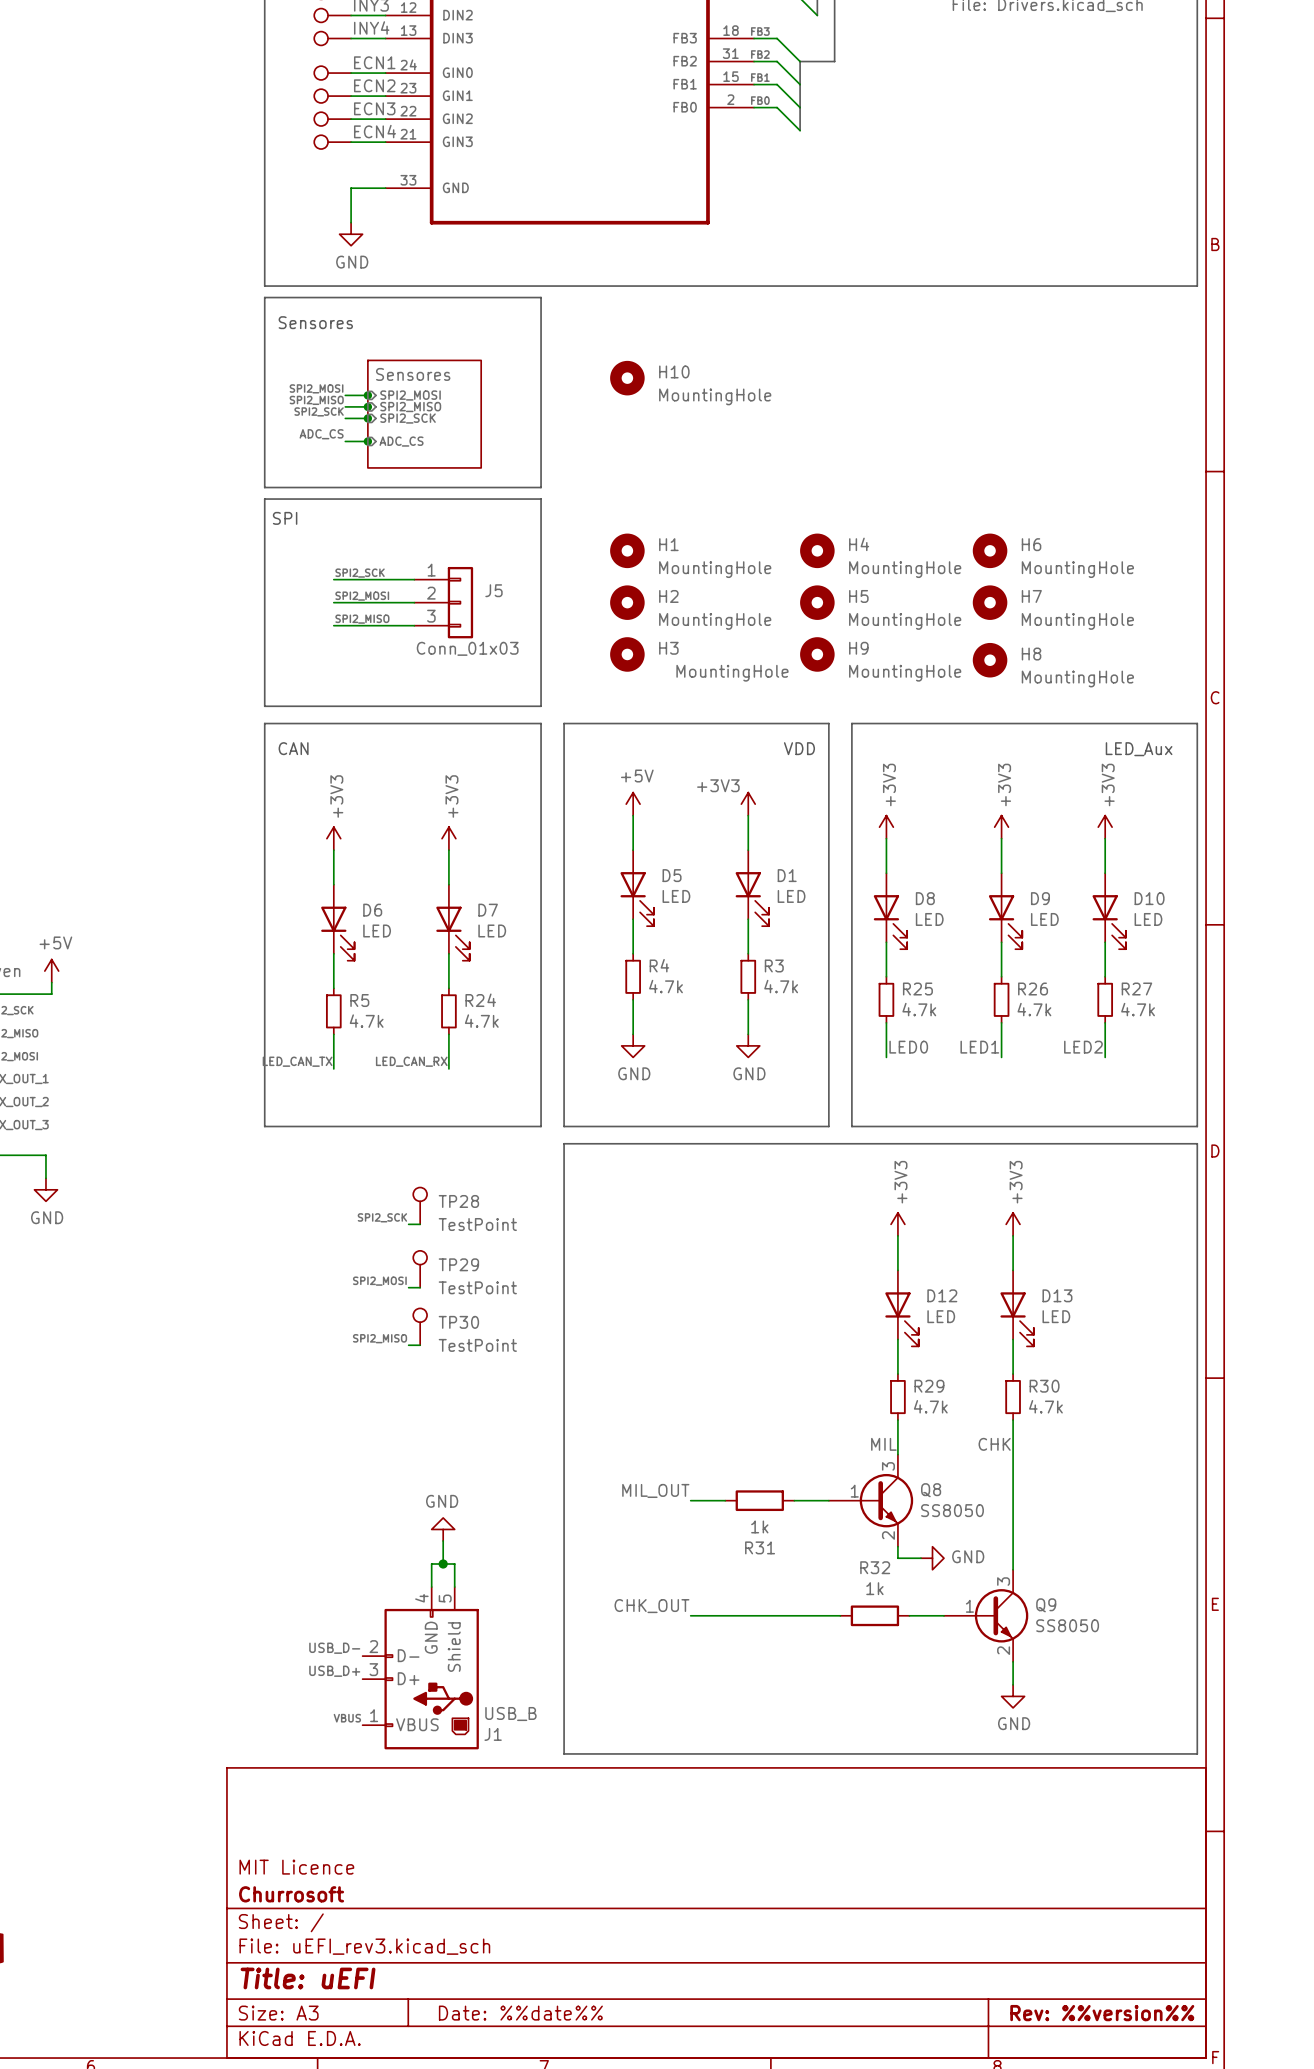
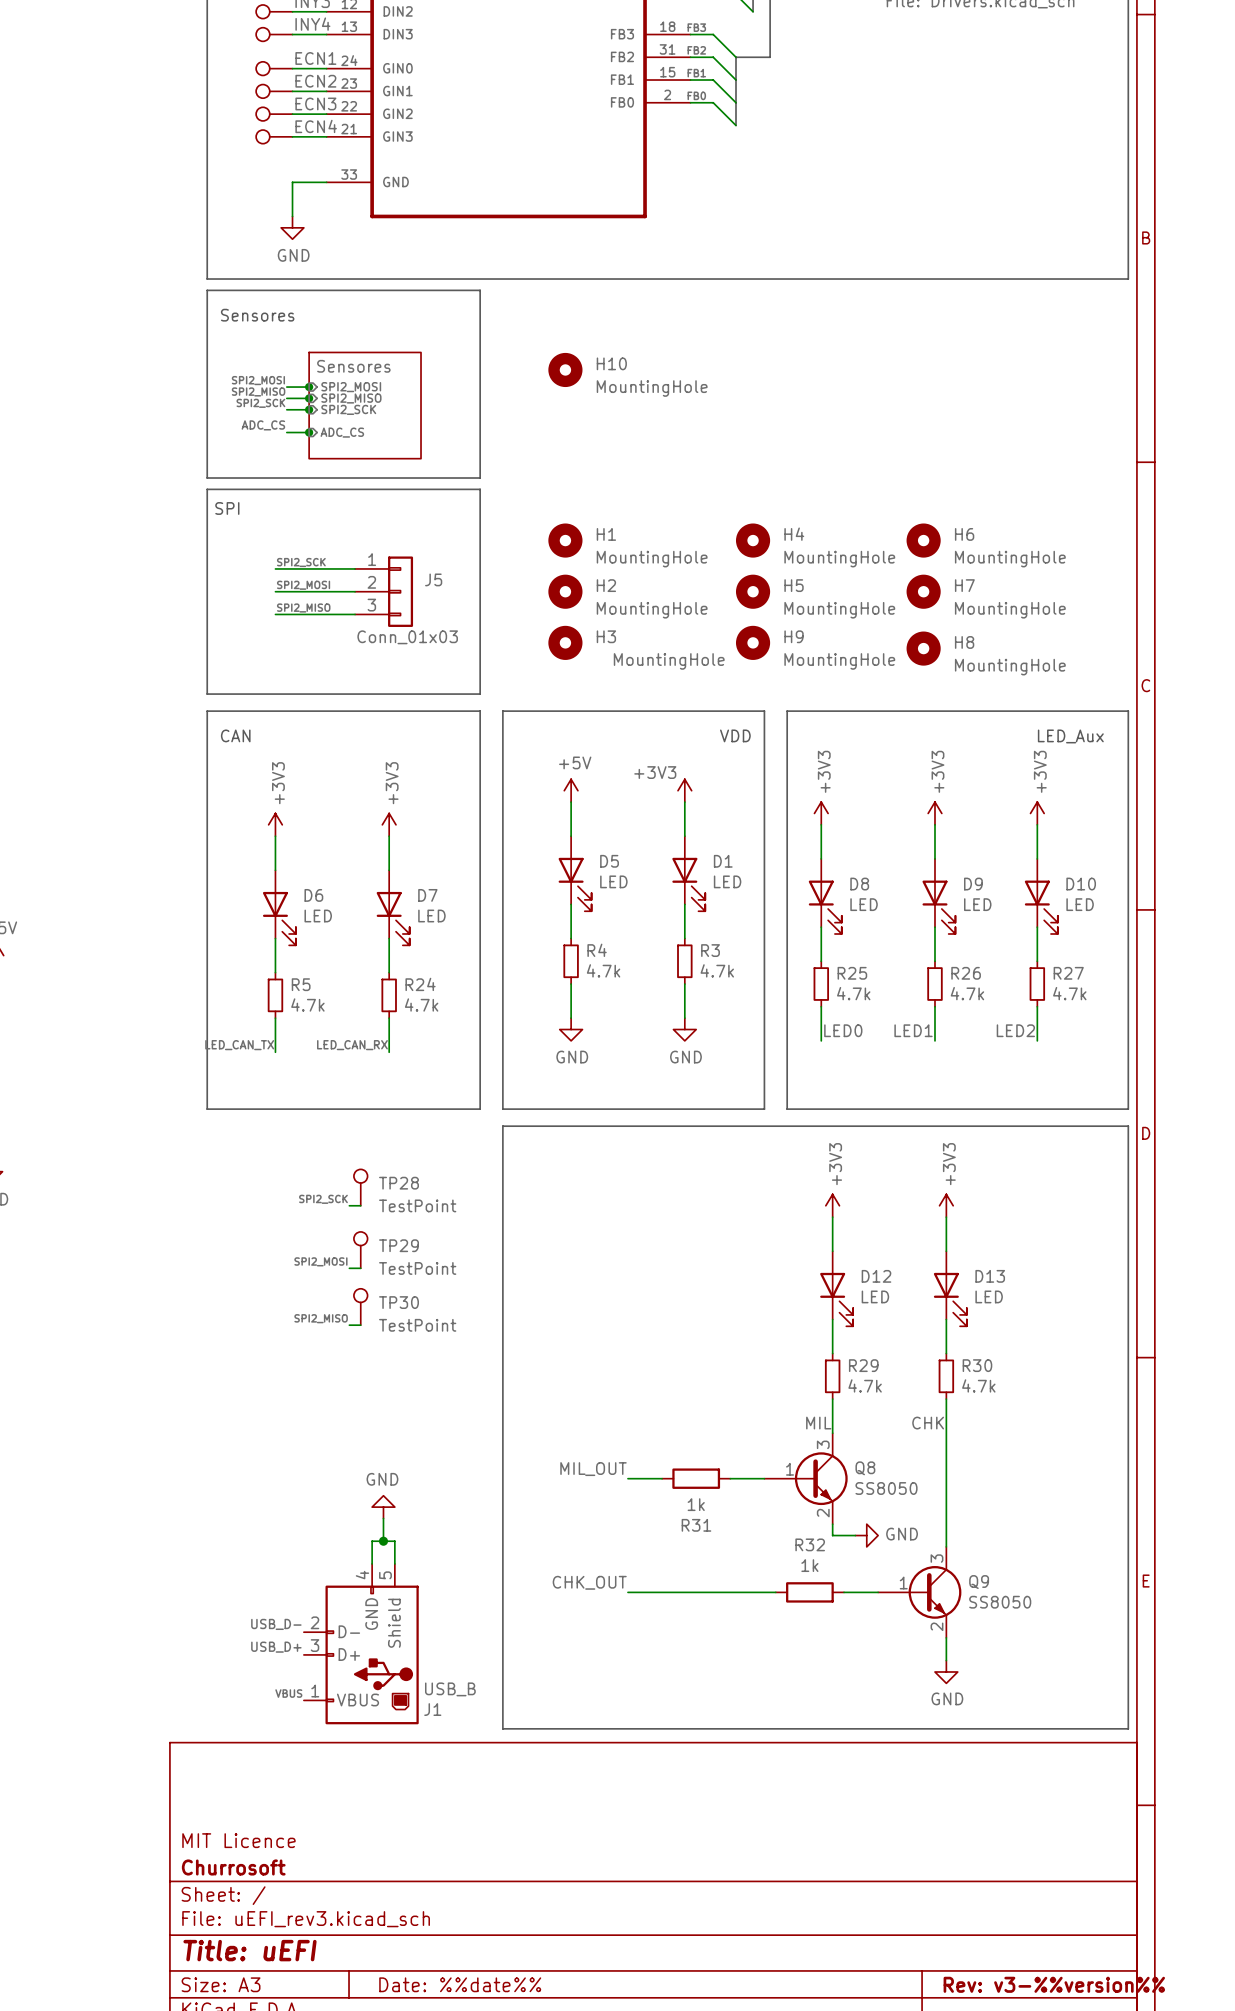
title block: Rev: %%version%% (1102, 2013) -> Rev: v3-%%version%% (1054, 1984)

